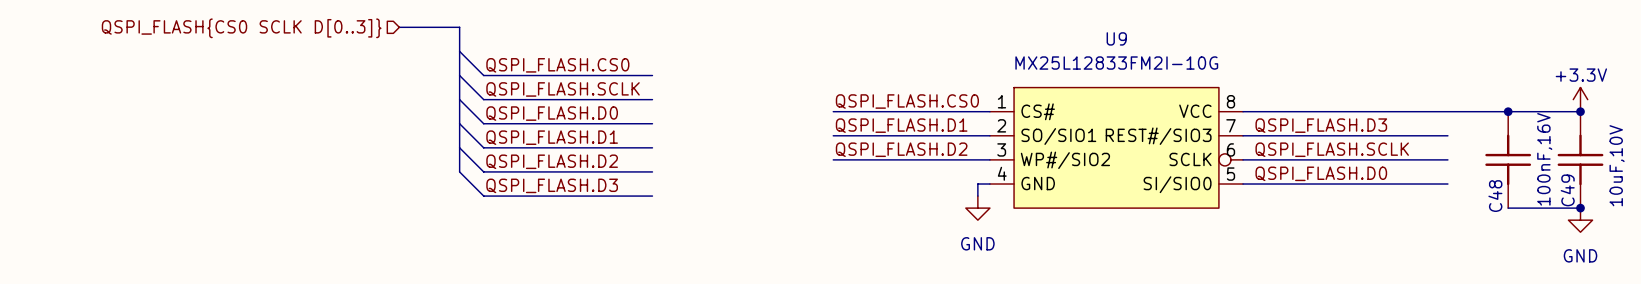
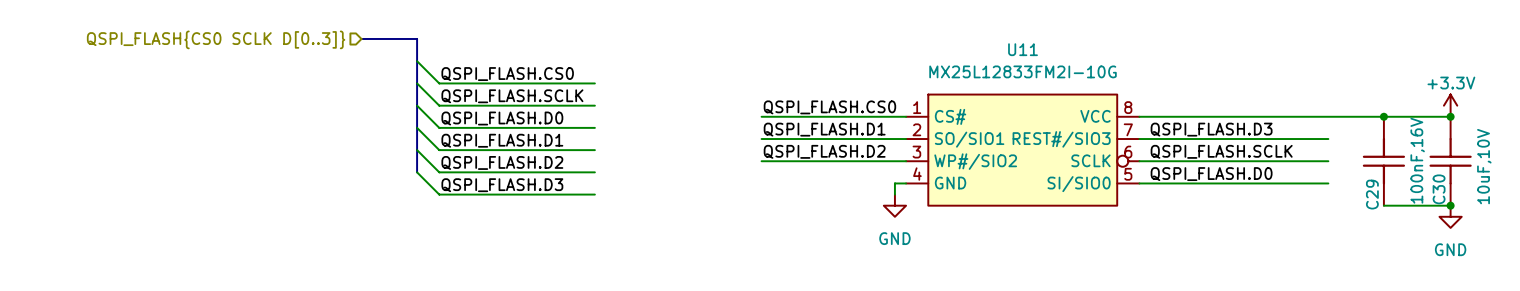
U9 name: U9 (1116, 38) -> U11 (1023, 49)
C49 name: C49 (1567, 190) -> C30 (1439, 189)
C48 name: C48 (1495, 196) -> C29 (1372, 194)

